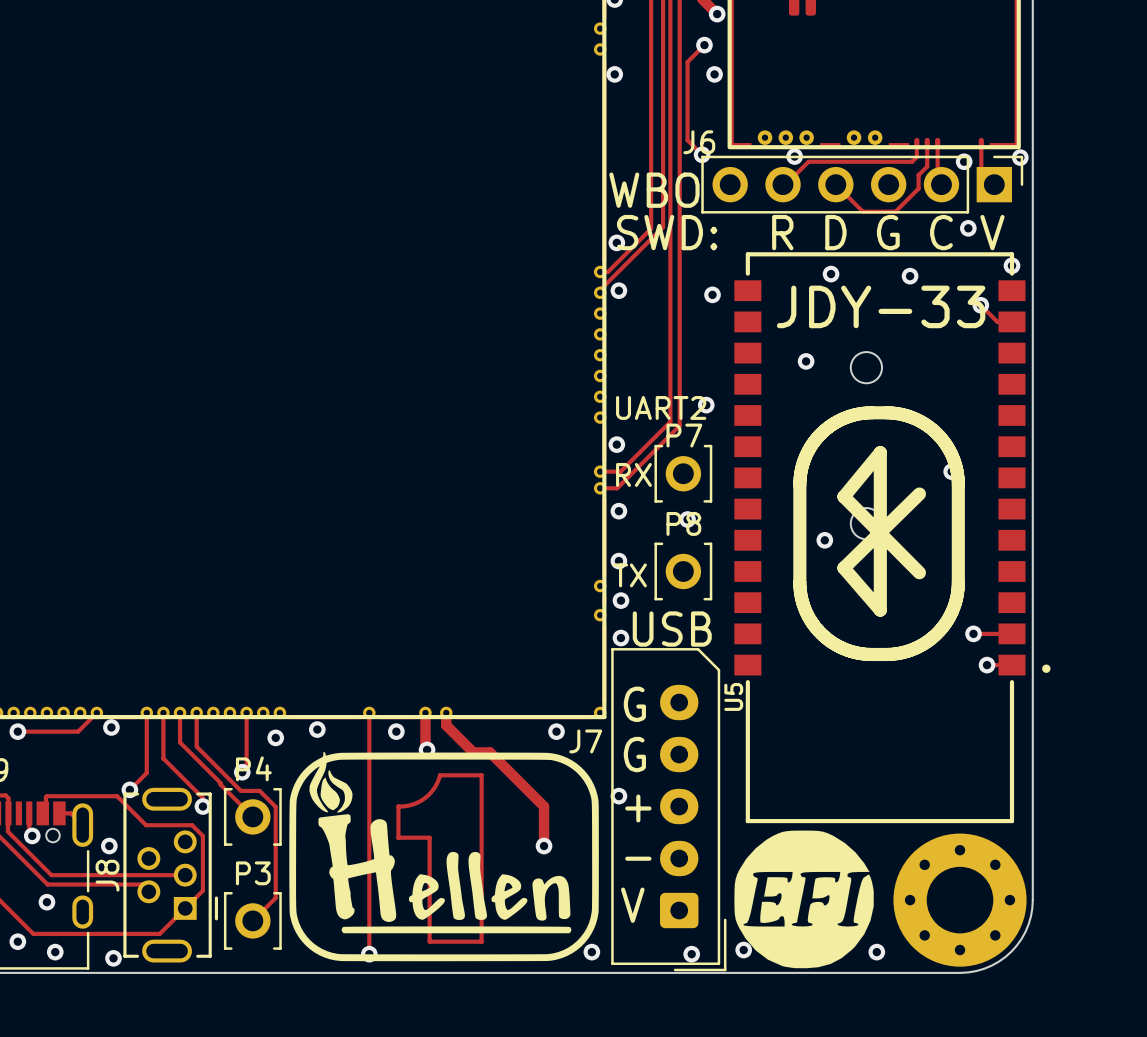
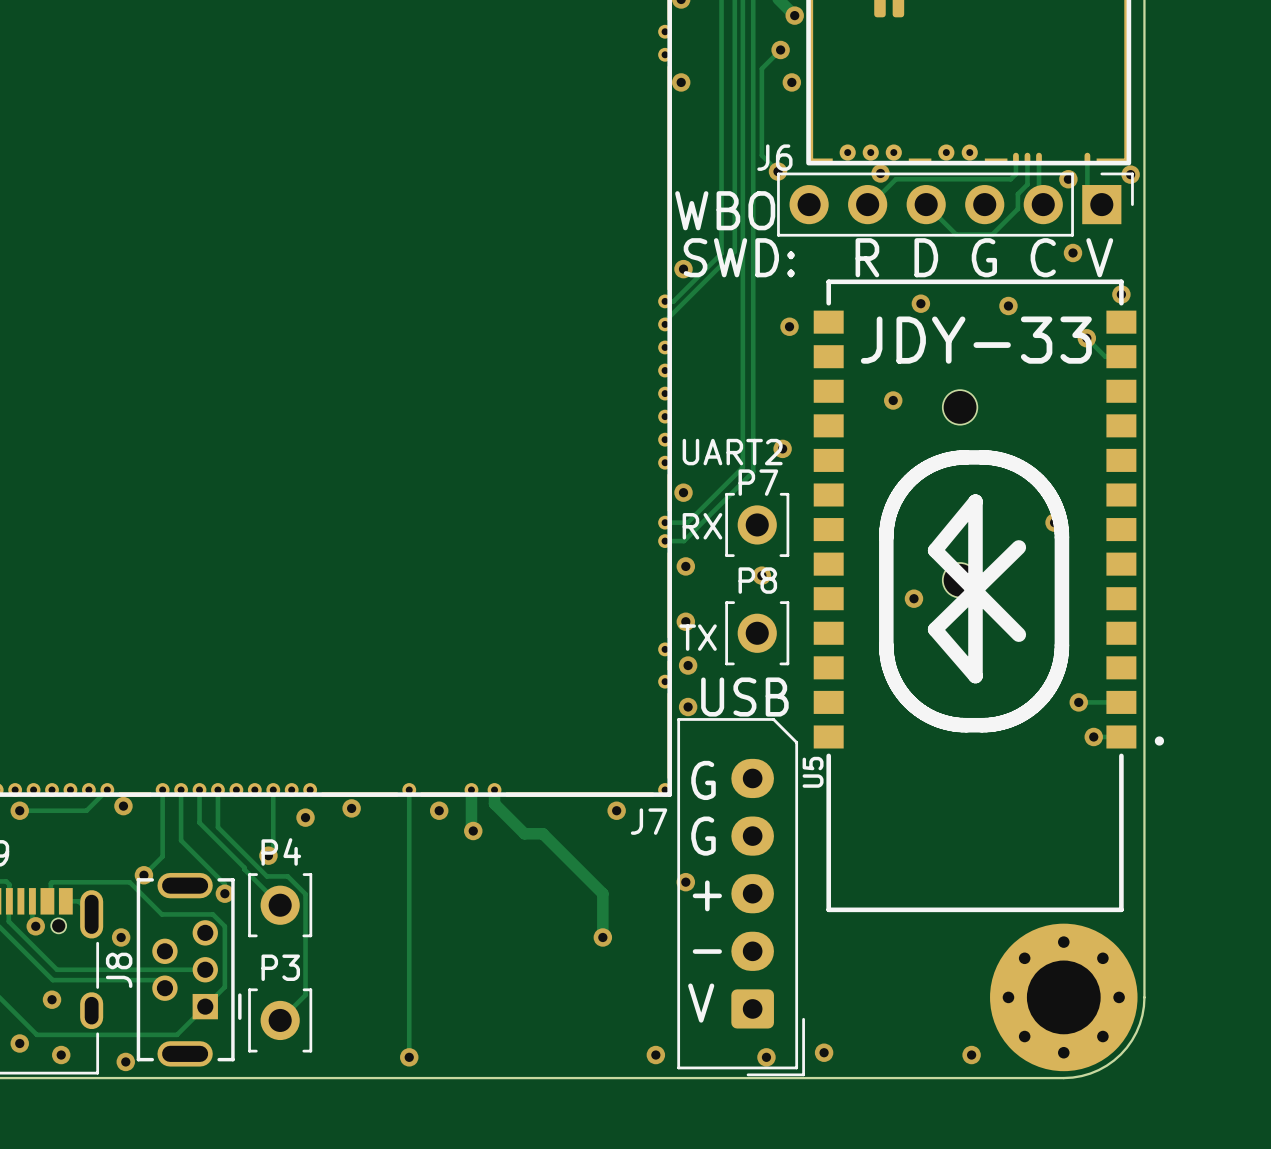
via: (618, 290) -> none
drawing: [289, 752, 599, 962] -> none
drawing: [734, 830, 874, 969] -> none

